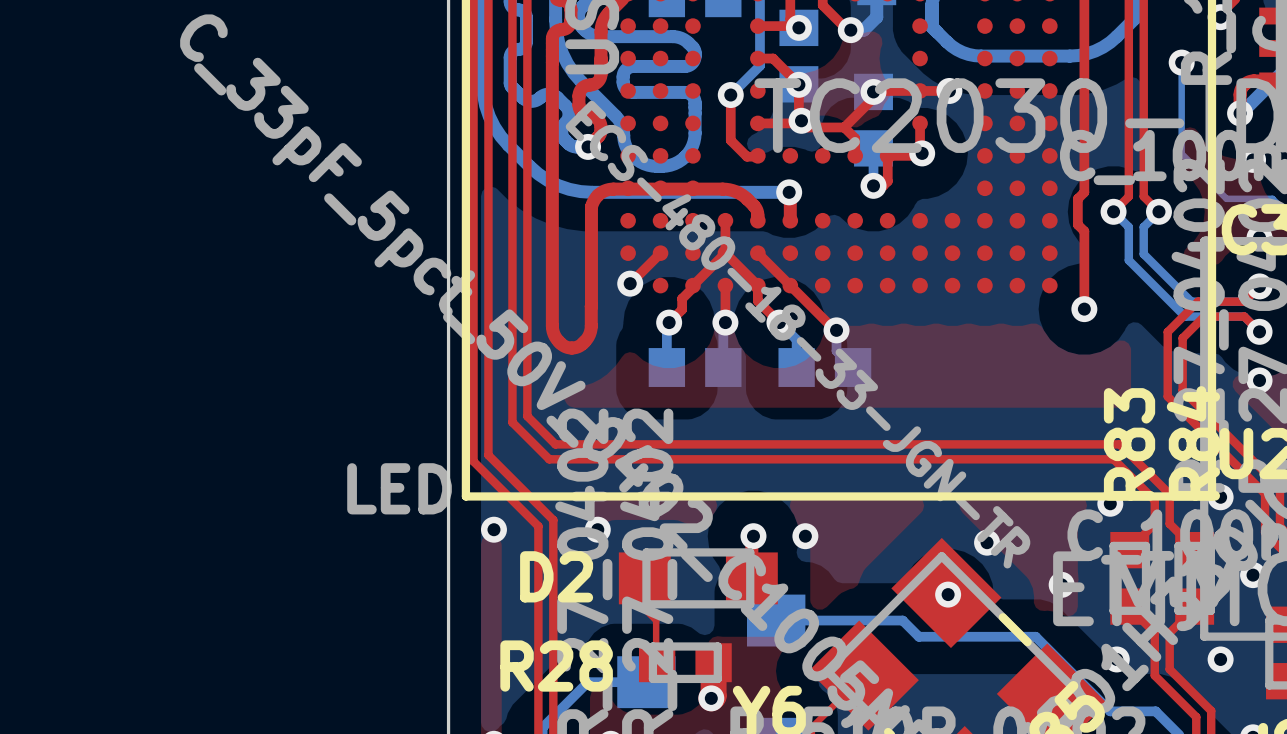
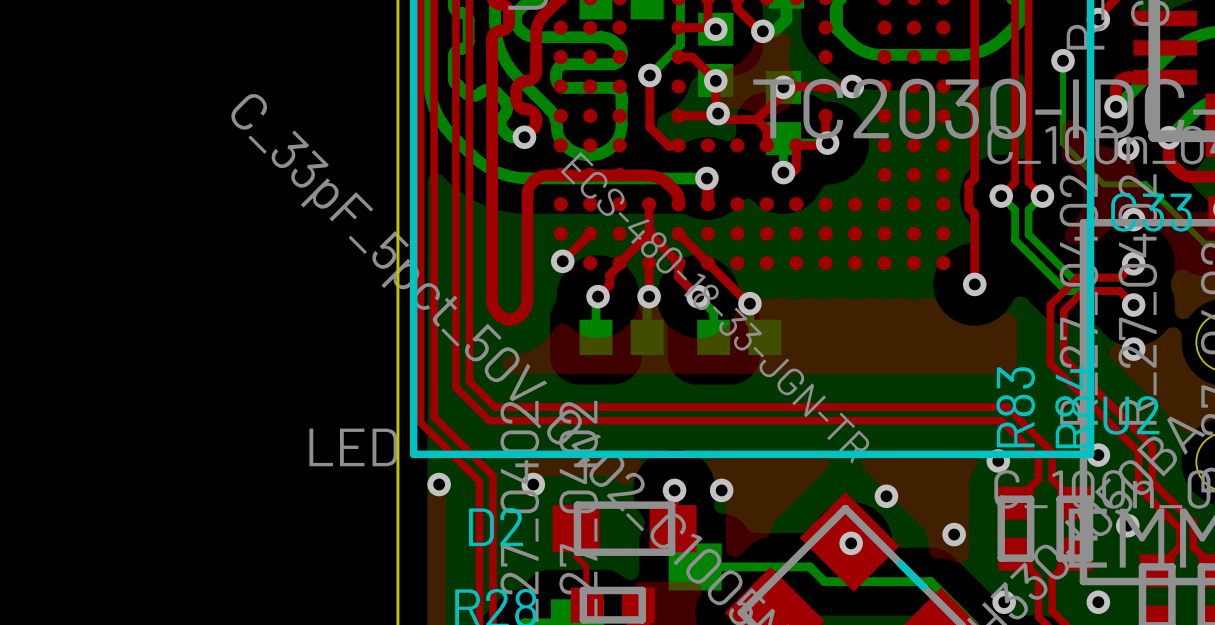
bottom track: (759, 45) (759, 65) (730, 95) -> (680, 44) (649, 75)
top track: (730, 95) (730, 140) -> (649, 75) (649, 127) (653, 131)
via position: (730, 95) -> (649, 75)

